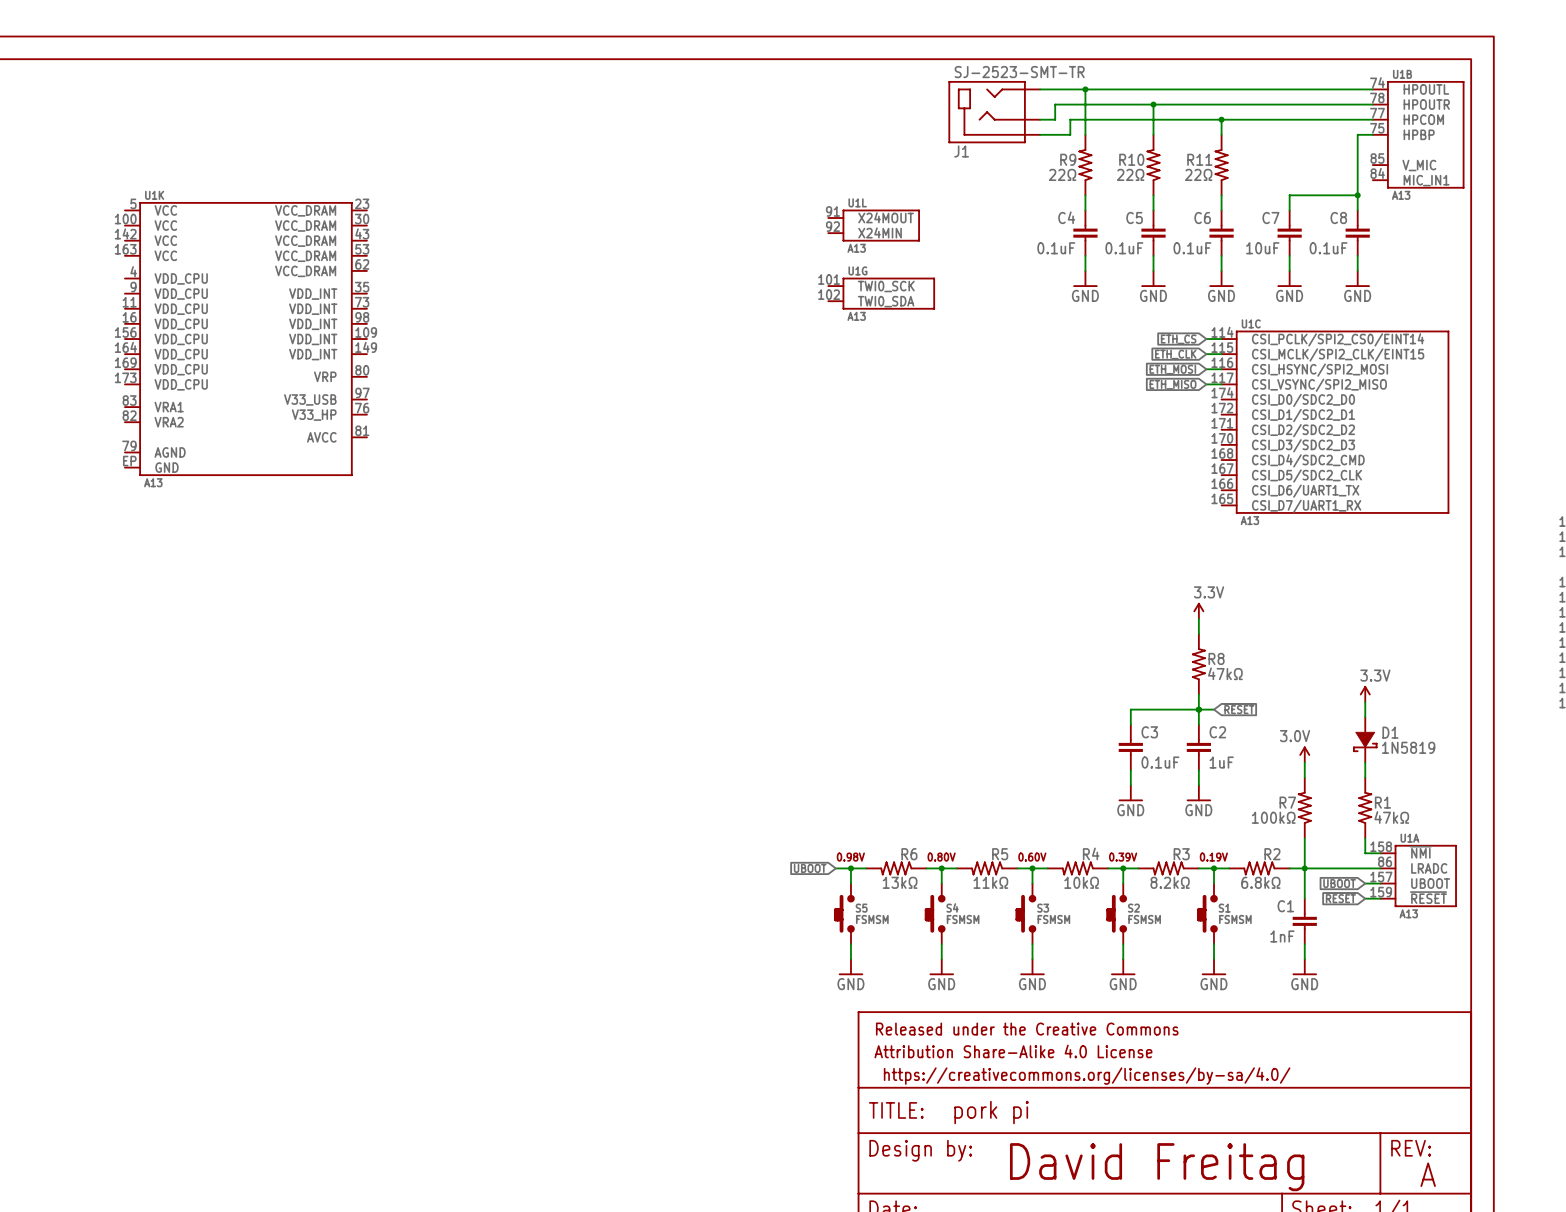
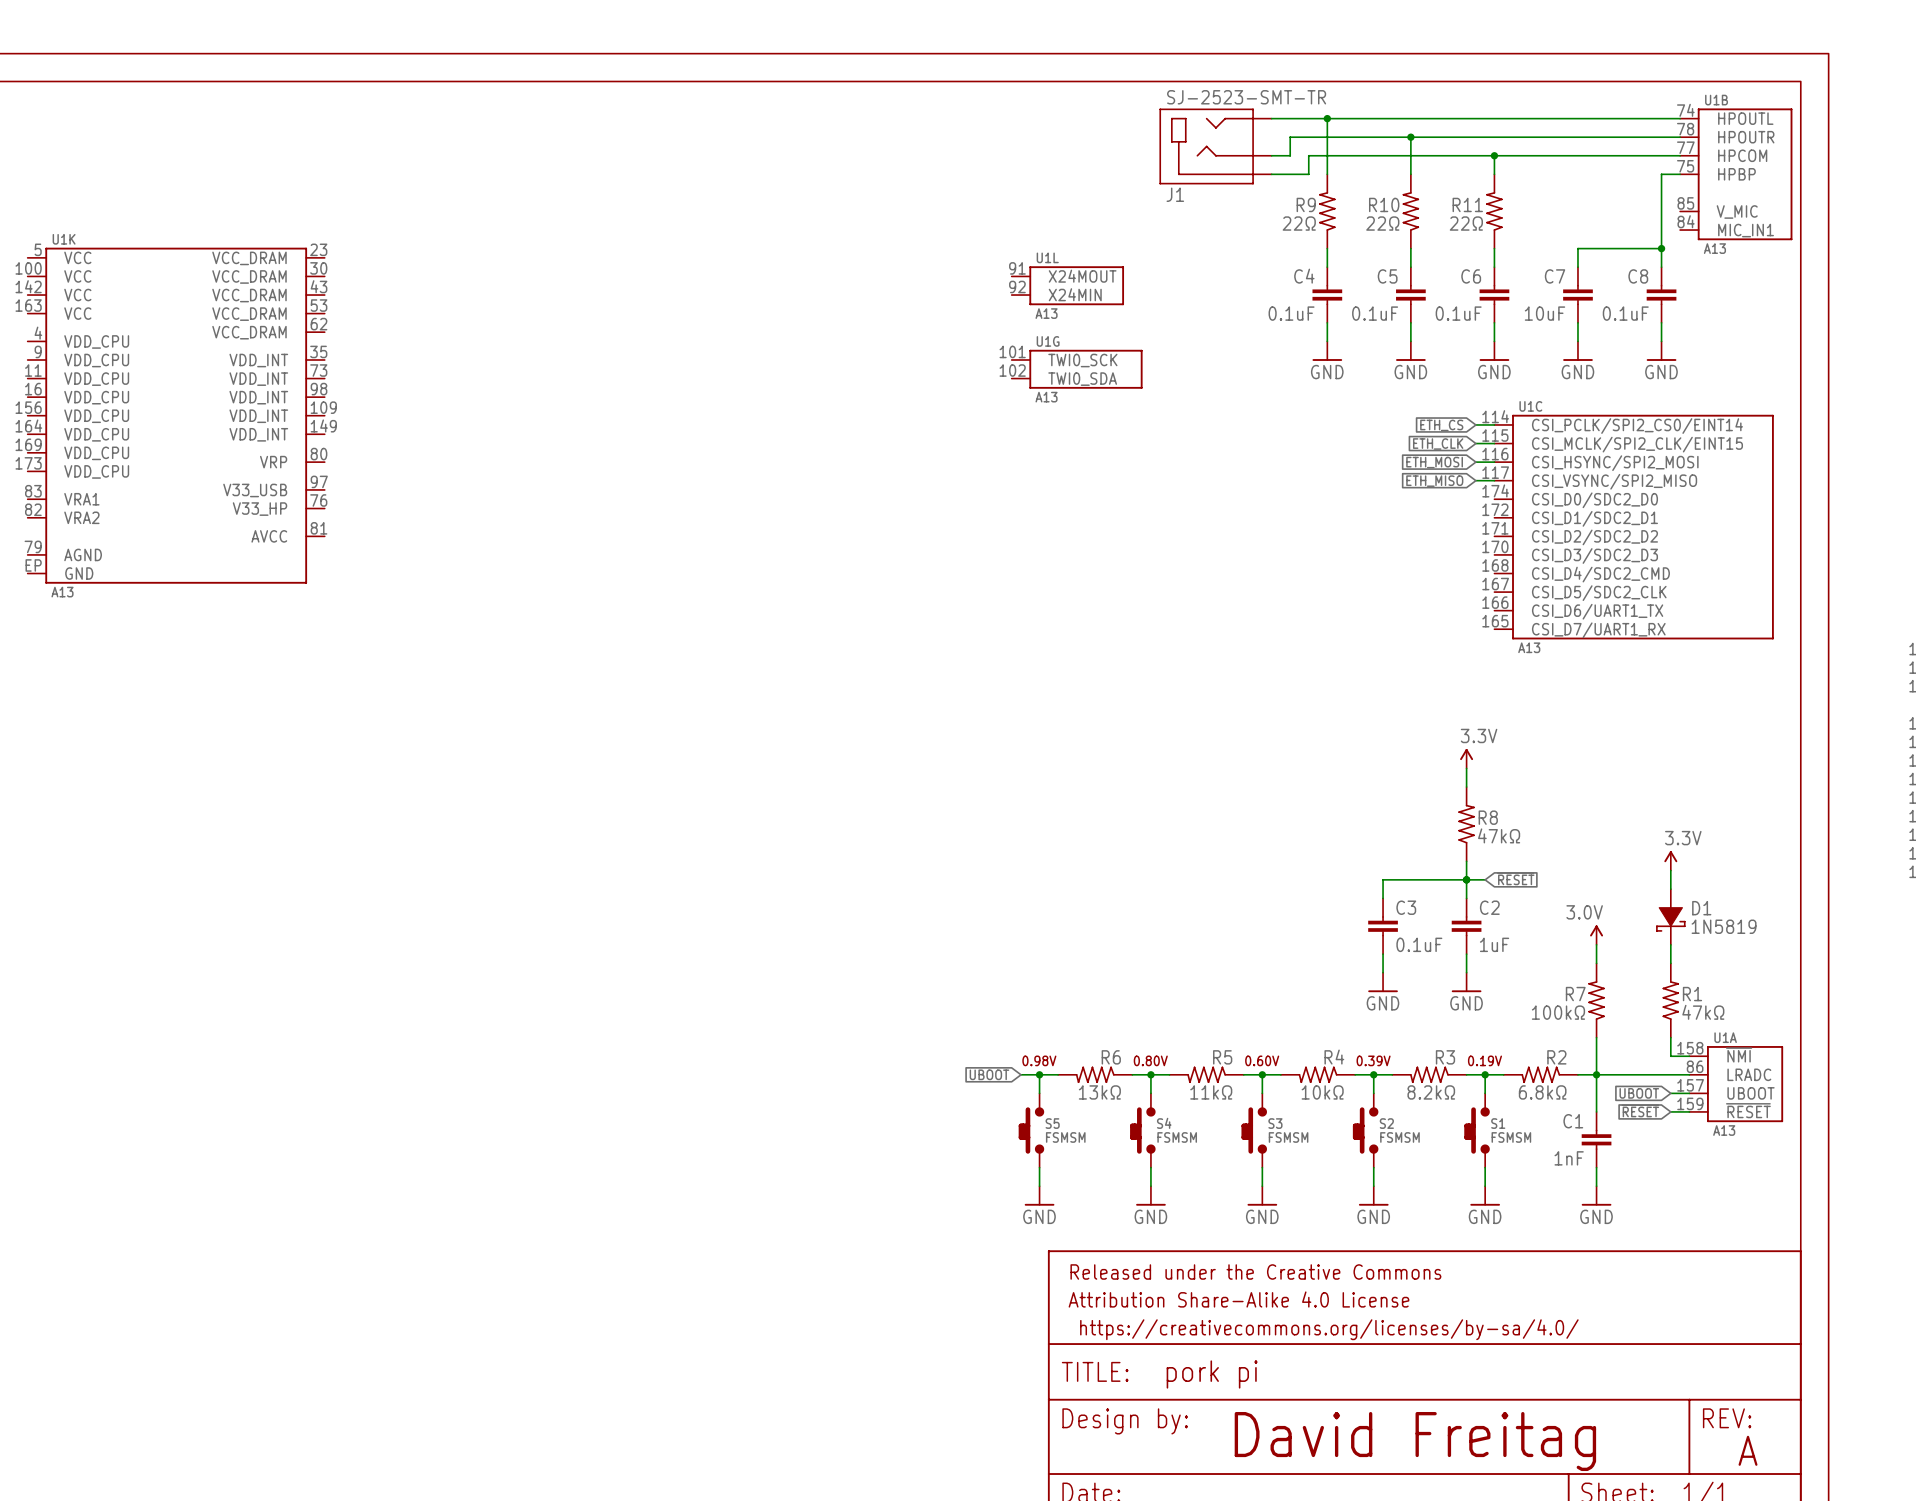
U1K position: (245, 339) -> (176, 415)

